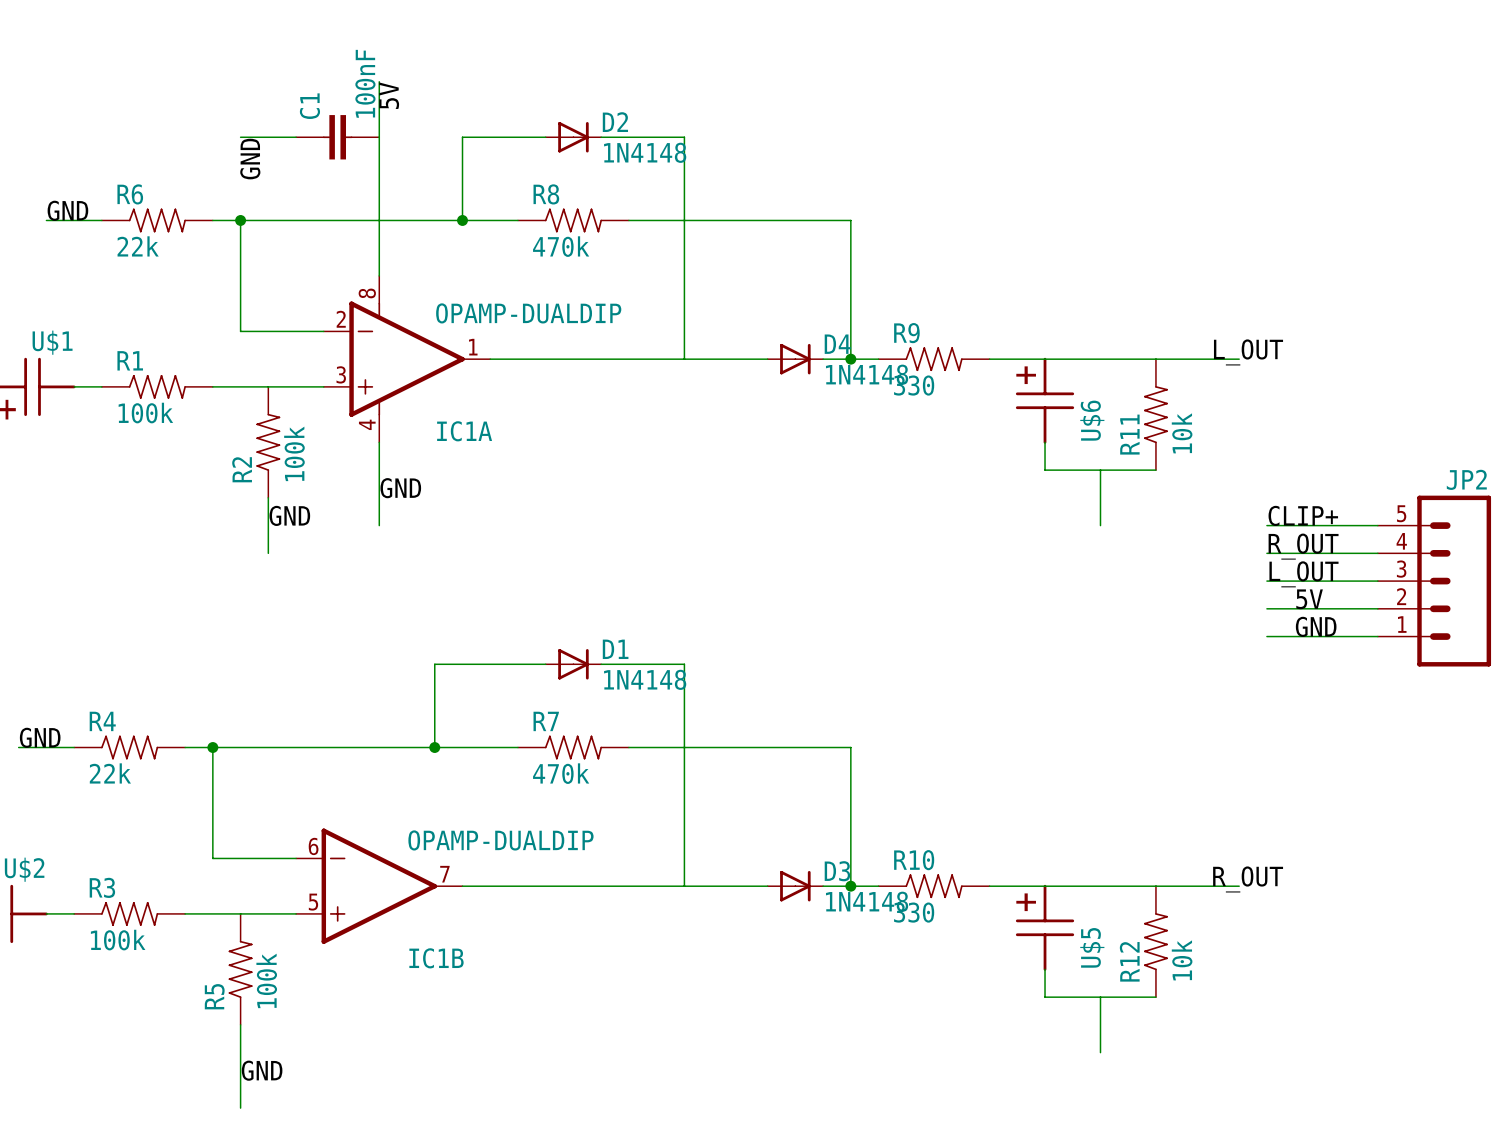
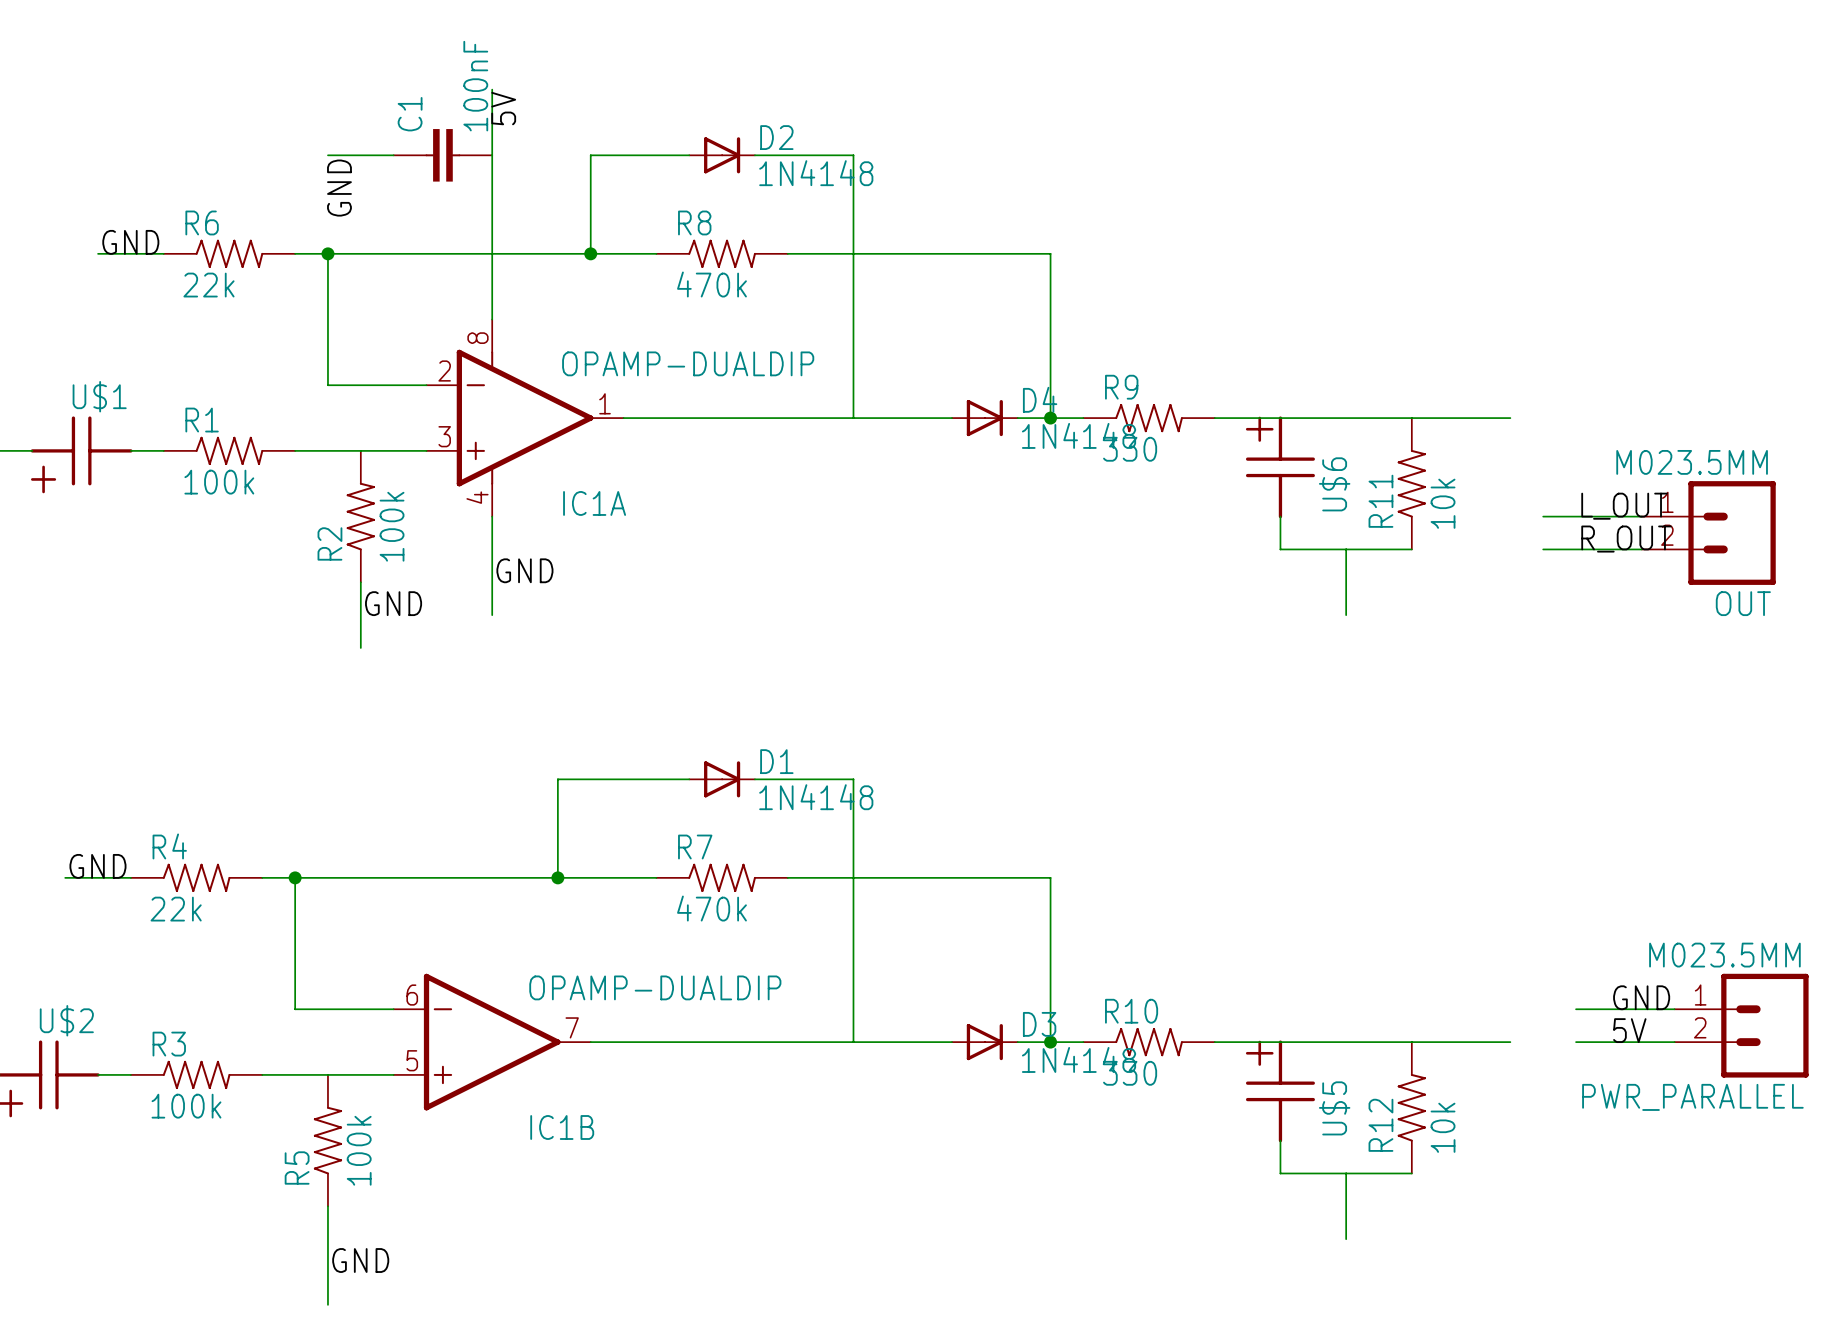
label: L_OUT (1248, 352) -> none
label: none -> L_OUT (1624, 506)
wire: none -> (1543, 516) (1641, 516)
OUT: none -> M023.5MM (1708, 533)
wire: none -> (1543, 549) (1641, 549)
label: CLIP+ (1303, 515) -> none
wire: (1266, 525) (1377, 525) -> none
label position: R_OUT (1303, 546) -> R_OUT (1626, 539)
wire: (1266, 553) (1377, 553) -> none
label: L_OUT (1303, 574) -> none
wire: (1266, 581) (1377, 581) -> none
JP2: (1434, 581) -> none
label: 5V (1309, 599) -> none
wire: (1266, 608) (1377, 608) -> none
label position: GND (1316, 626) -> GND (1641, 997)
wire: (1266, 636) (1377, 636) -> none
wire: none -> (1576, 1009) (1674, 1009)
PWR_PARALLEL: none -> M023.5MM (1741, 1025)
label: none -> 5V (1629, 1030)
label: R_OUT (1248, 879) -> none
wire: none -> (1576, 1042) (1674, 1042)

